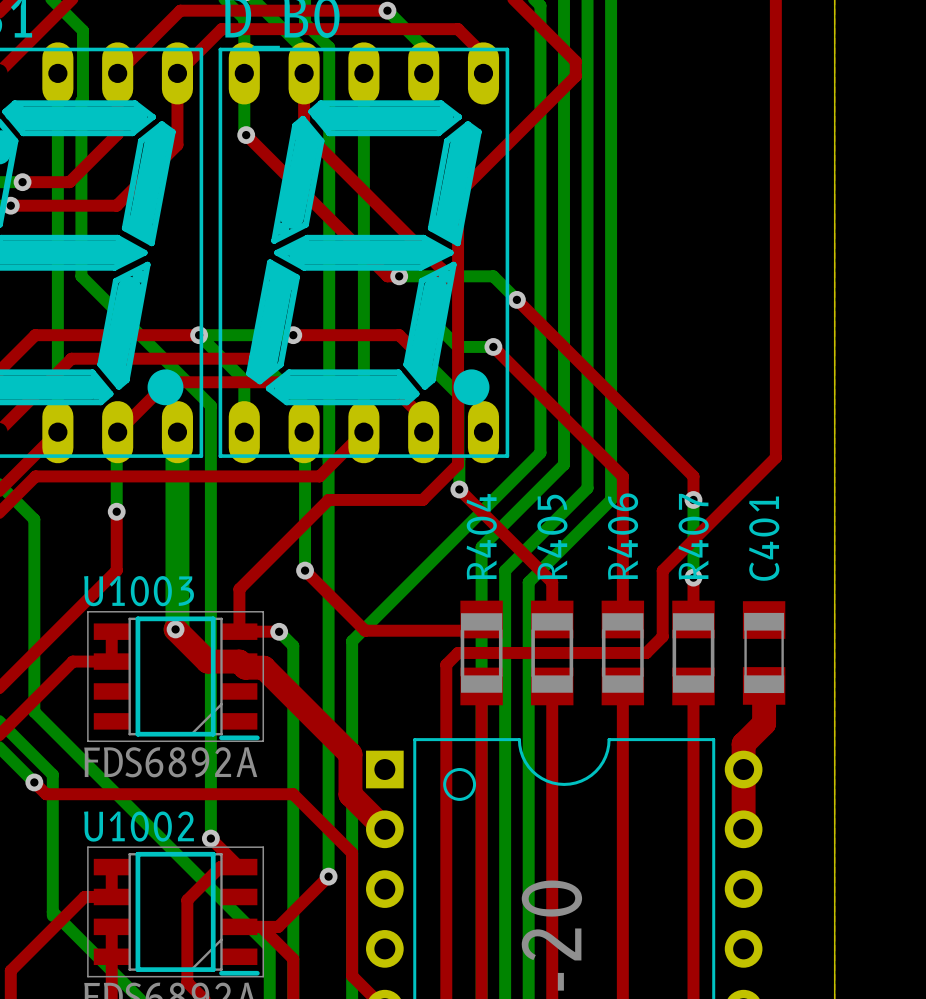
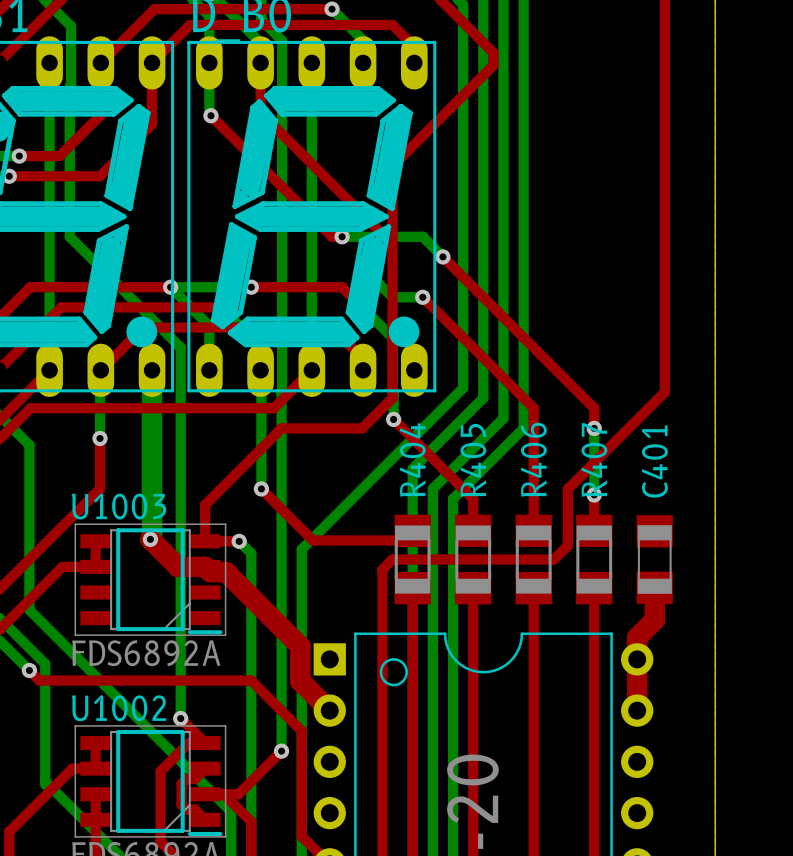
top track: none -> (205, 768) (194, 778) (186, 778) (181, 783) (181, 804) (186, 809) (194, 809) (205, 819)

